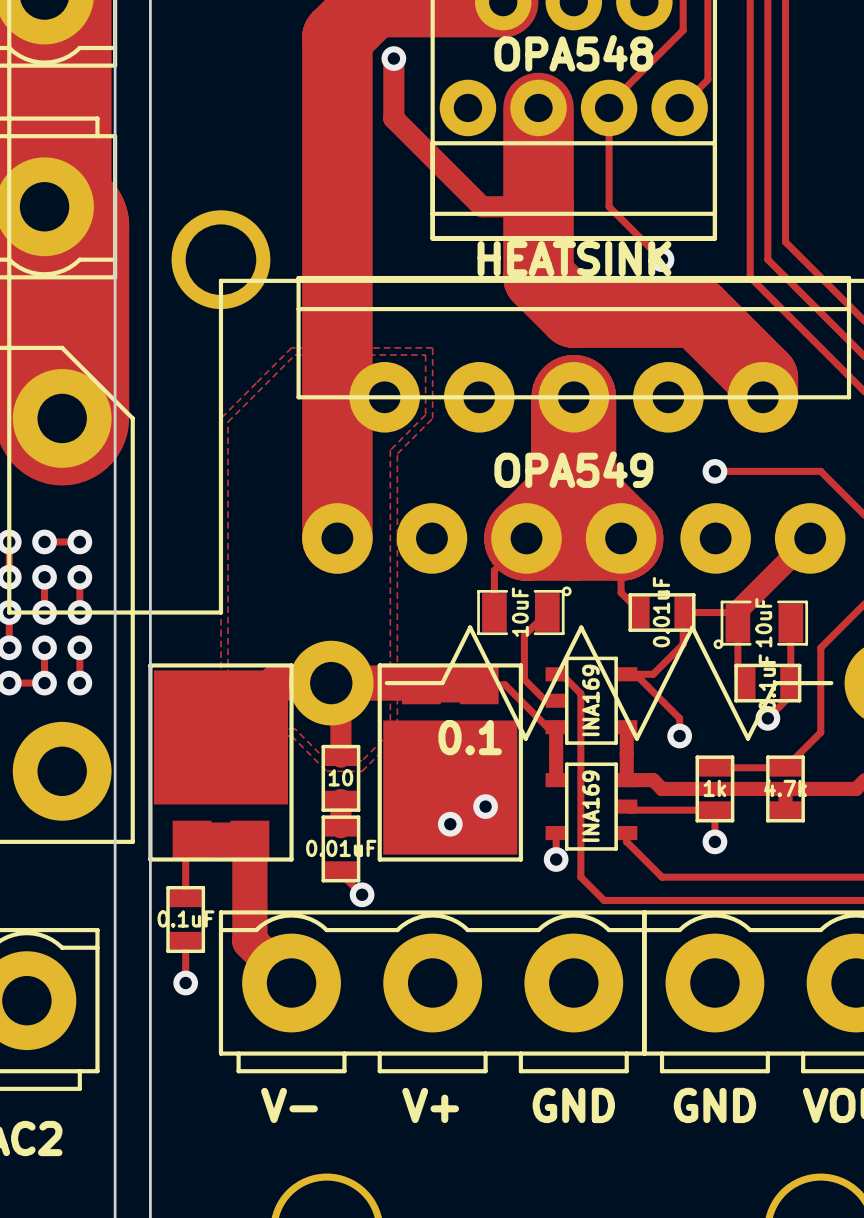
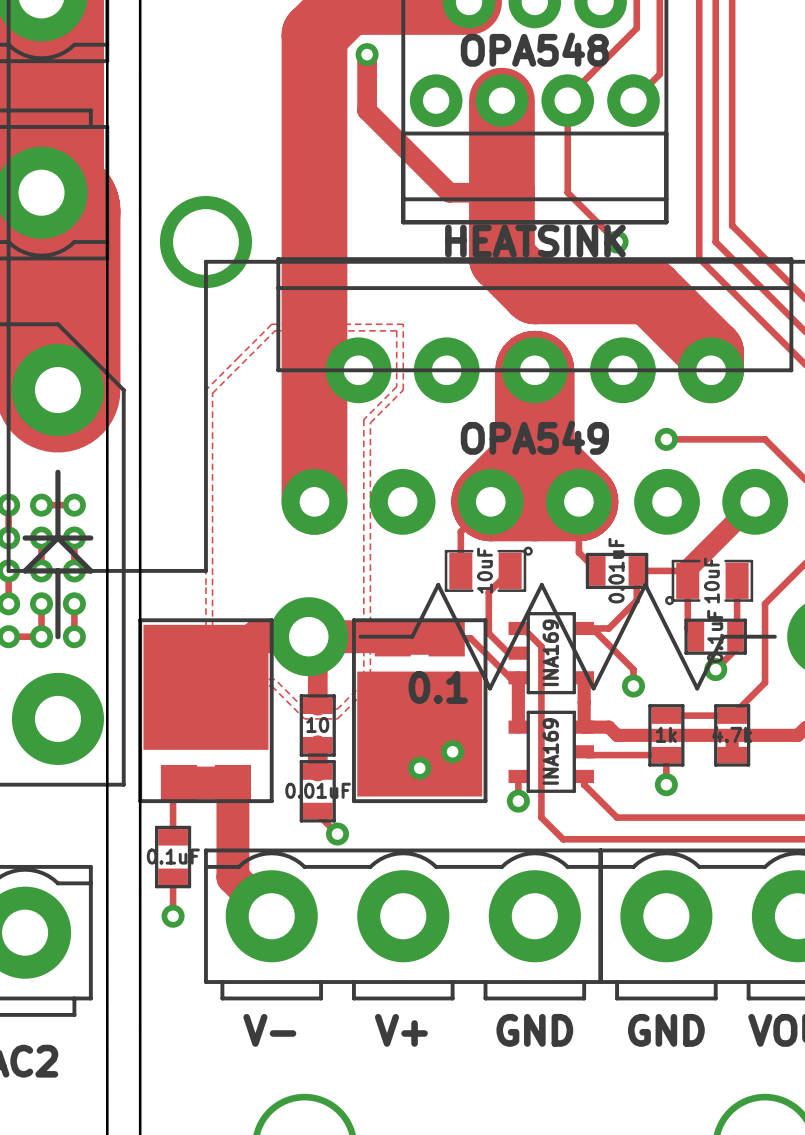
line: none -> (57, 472) (57, 538)
line: none -> (25, 538) (90, 538)
line: none -> (57, 538) (90, 570) (25, 570) (57, 538)
line: none -> (57, 570) (57, 636)

